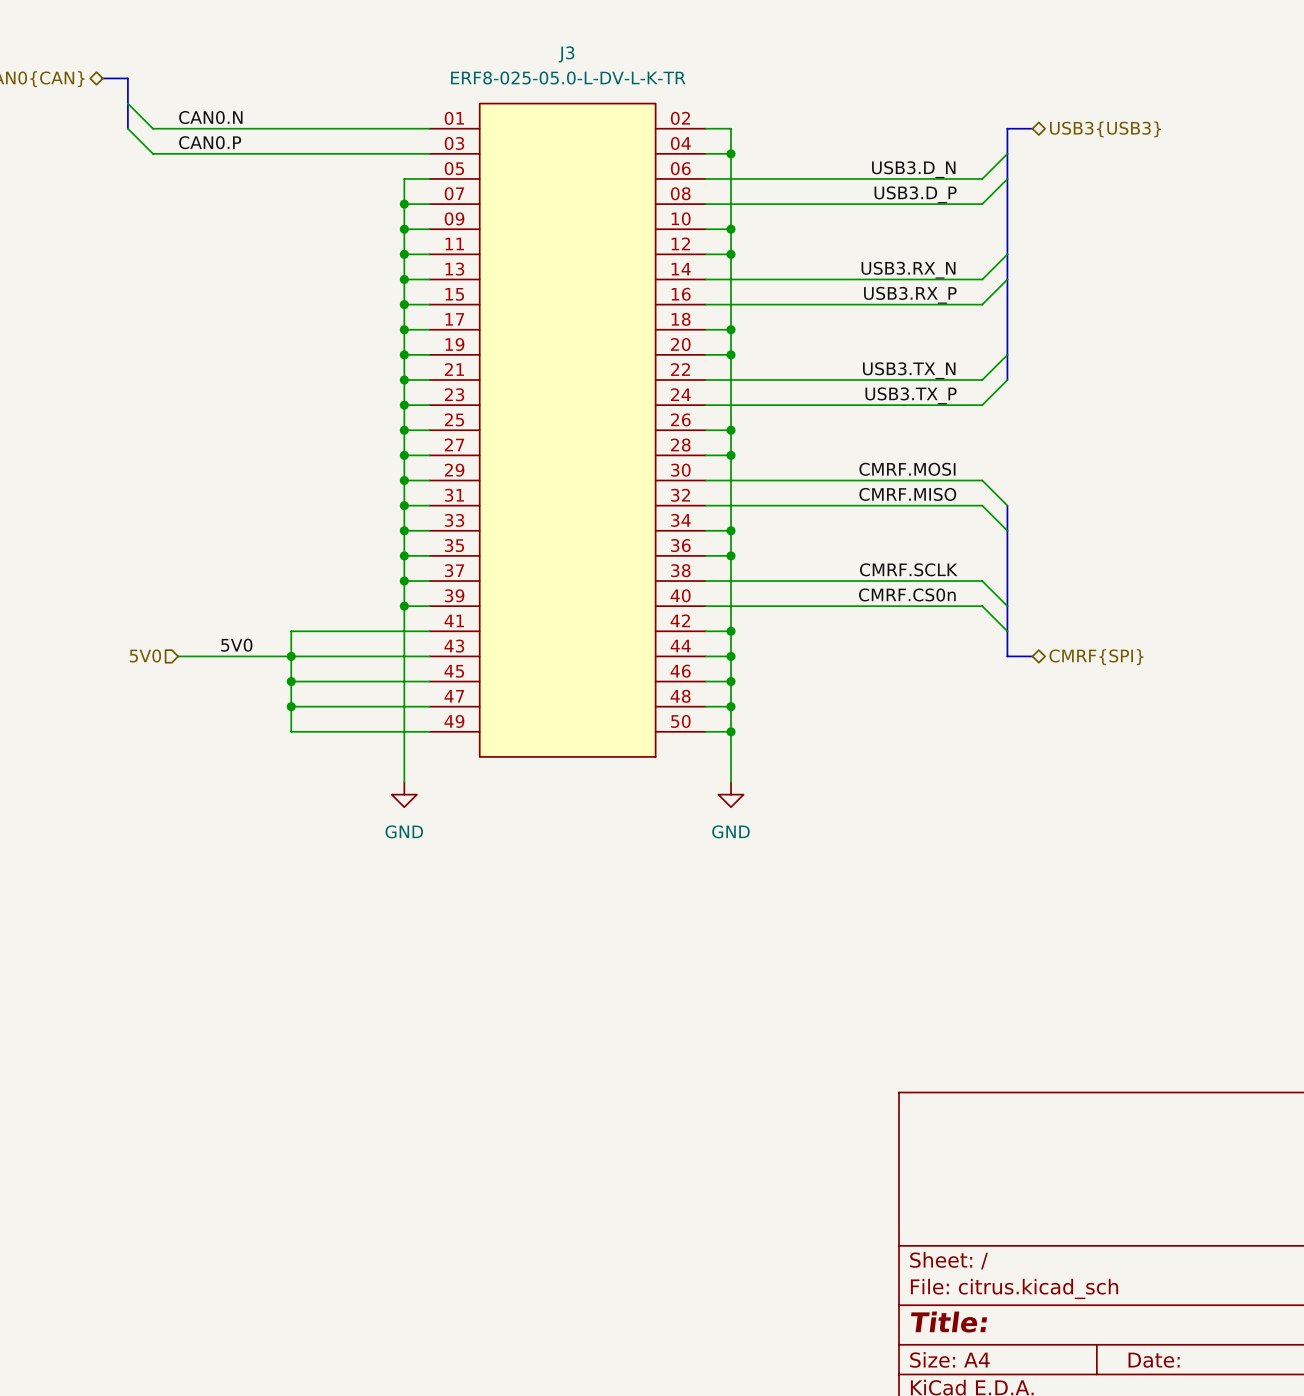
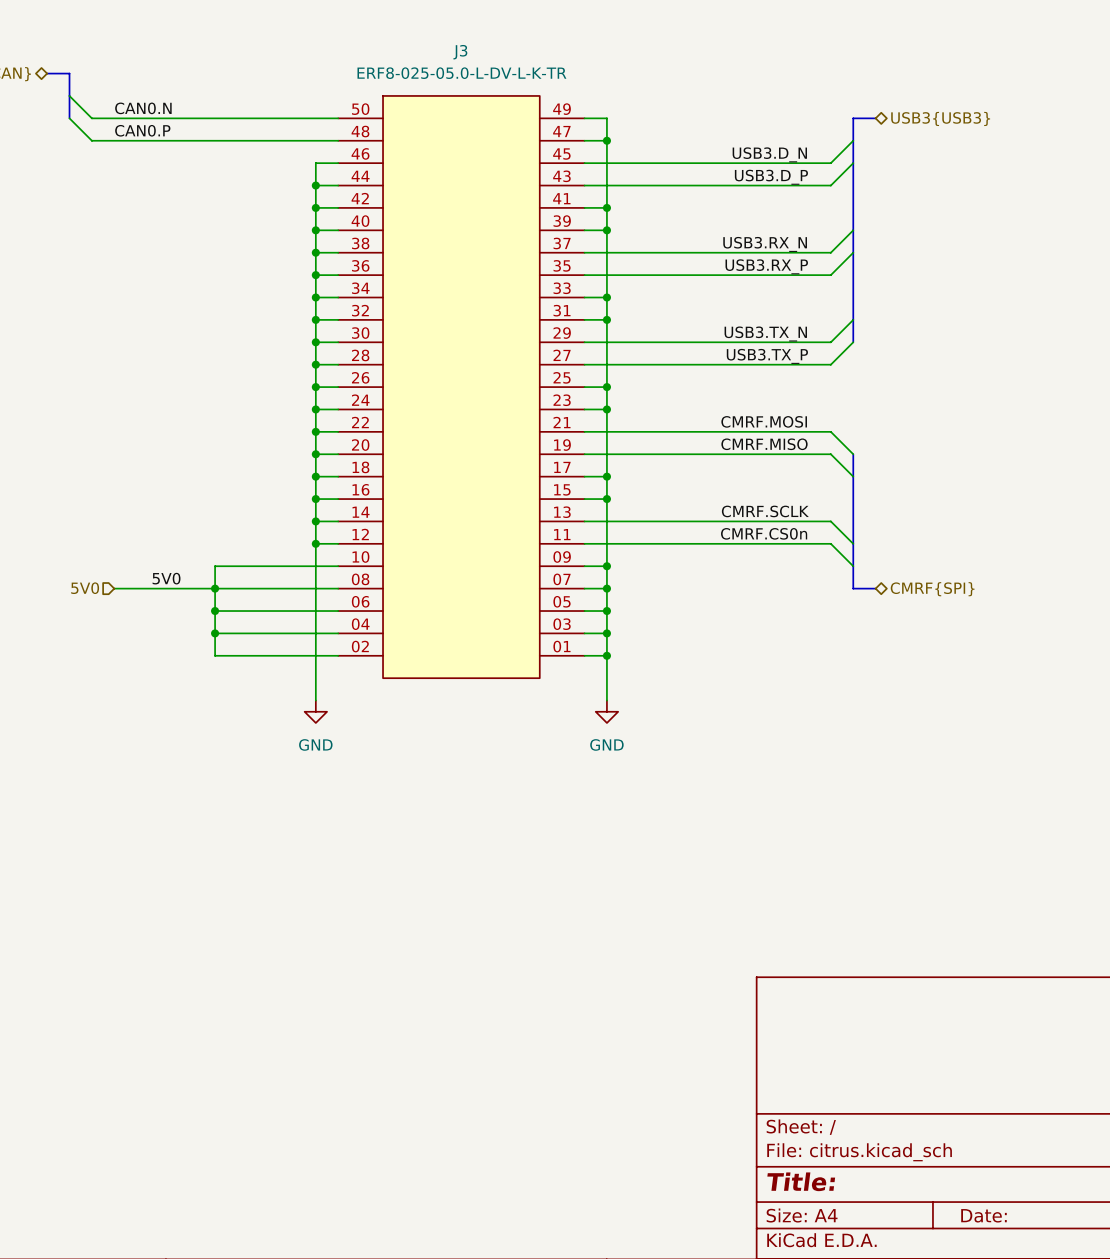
J3 rotation: 0° (567, 430) -> 180° (461, 387)

